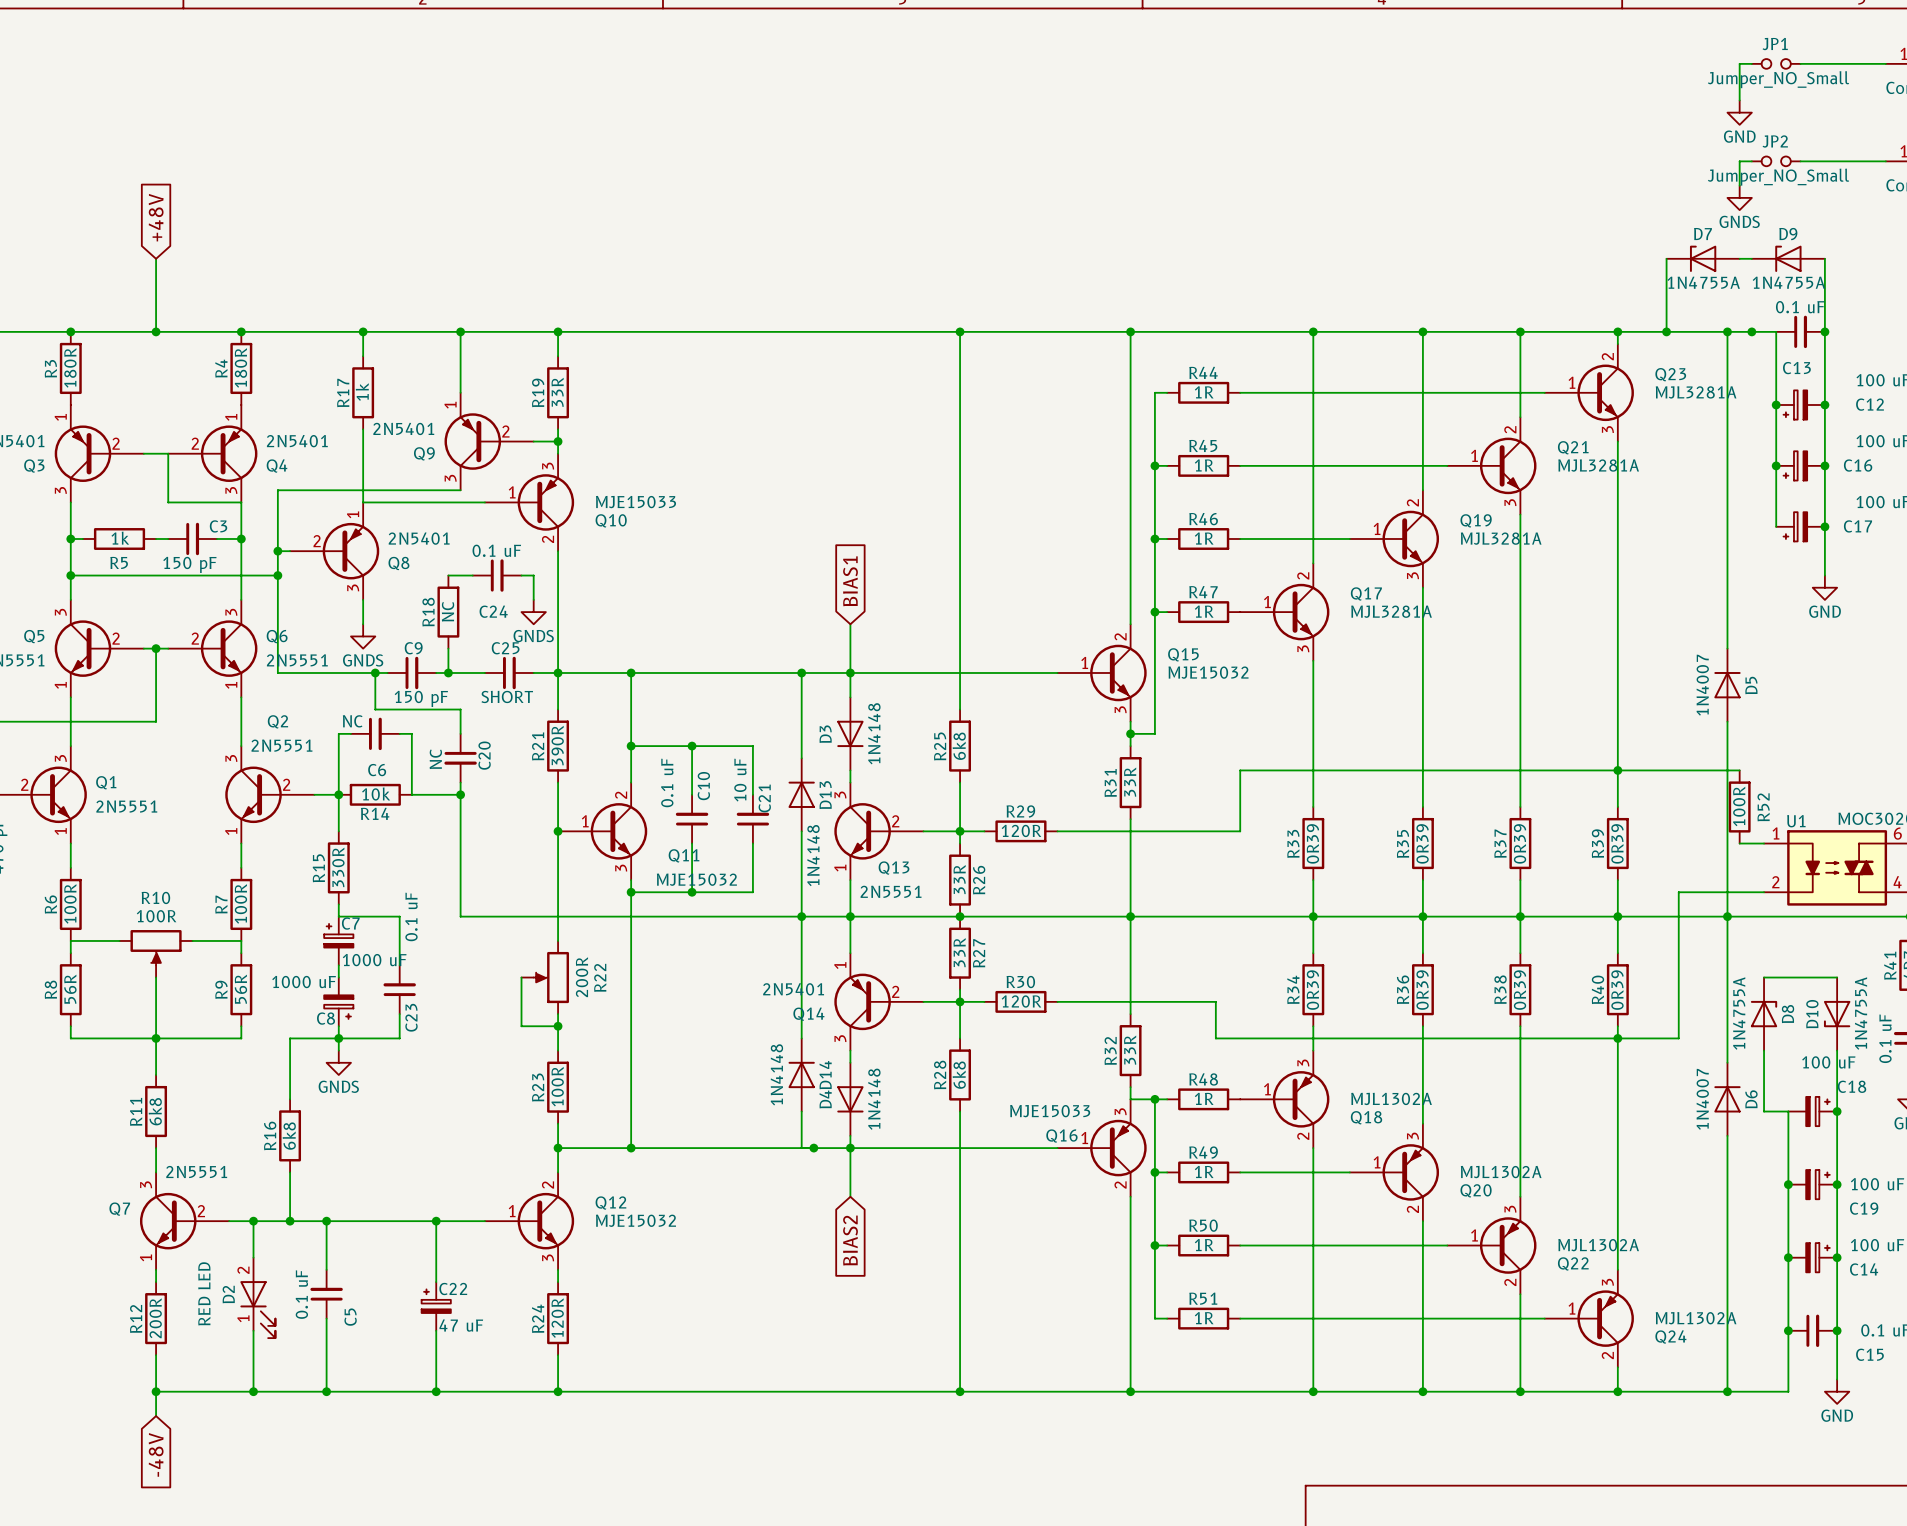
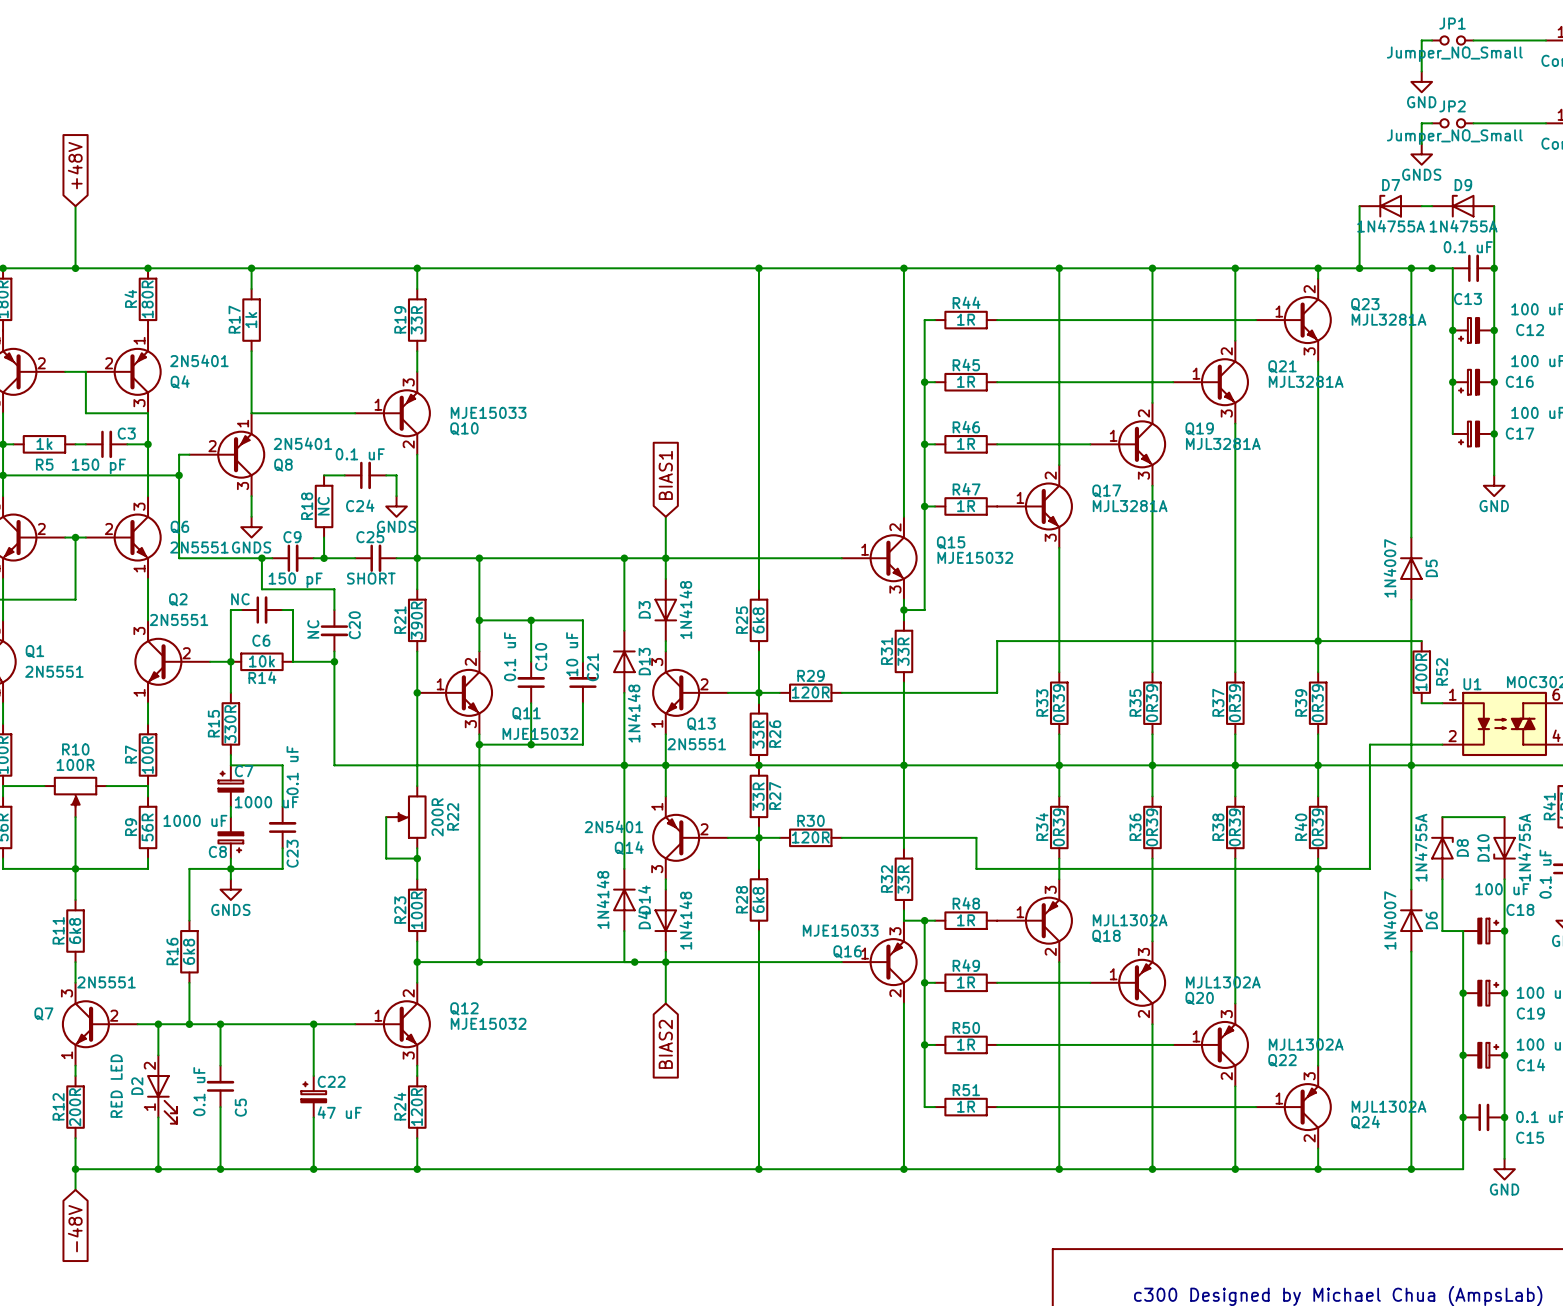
wire: (460, 331) (460, 392) -> none
junction: (460, 331) -> none
Q9: 2N5401 (489, 441) -> none
wire: (533, 441) (558, 441) -> none
junction: (558, 441) -> none
wire: (460, 490) (277, 490) (277, 551) -> none
junction: (277, 551) -> none

